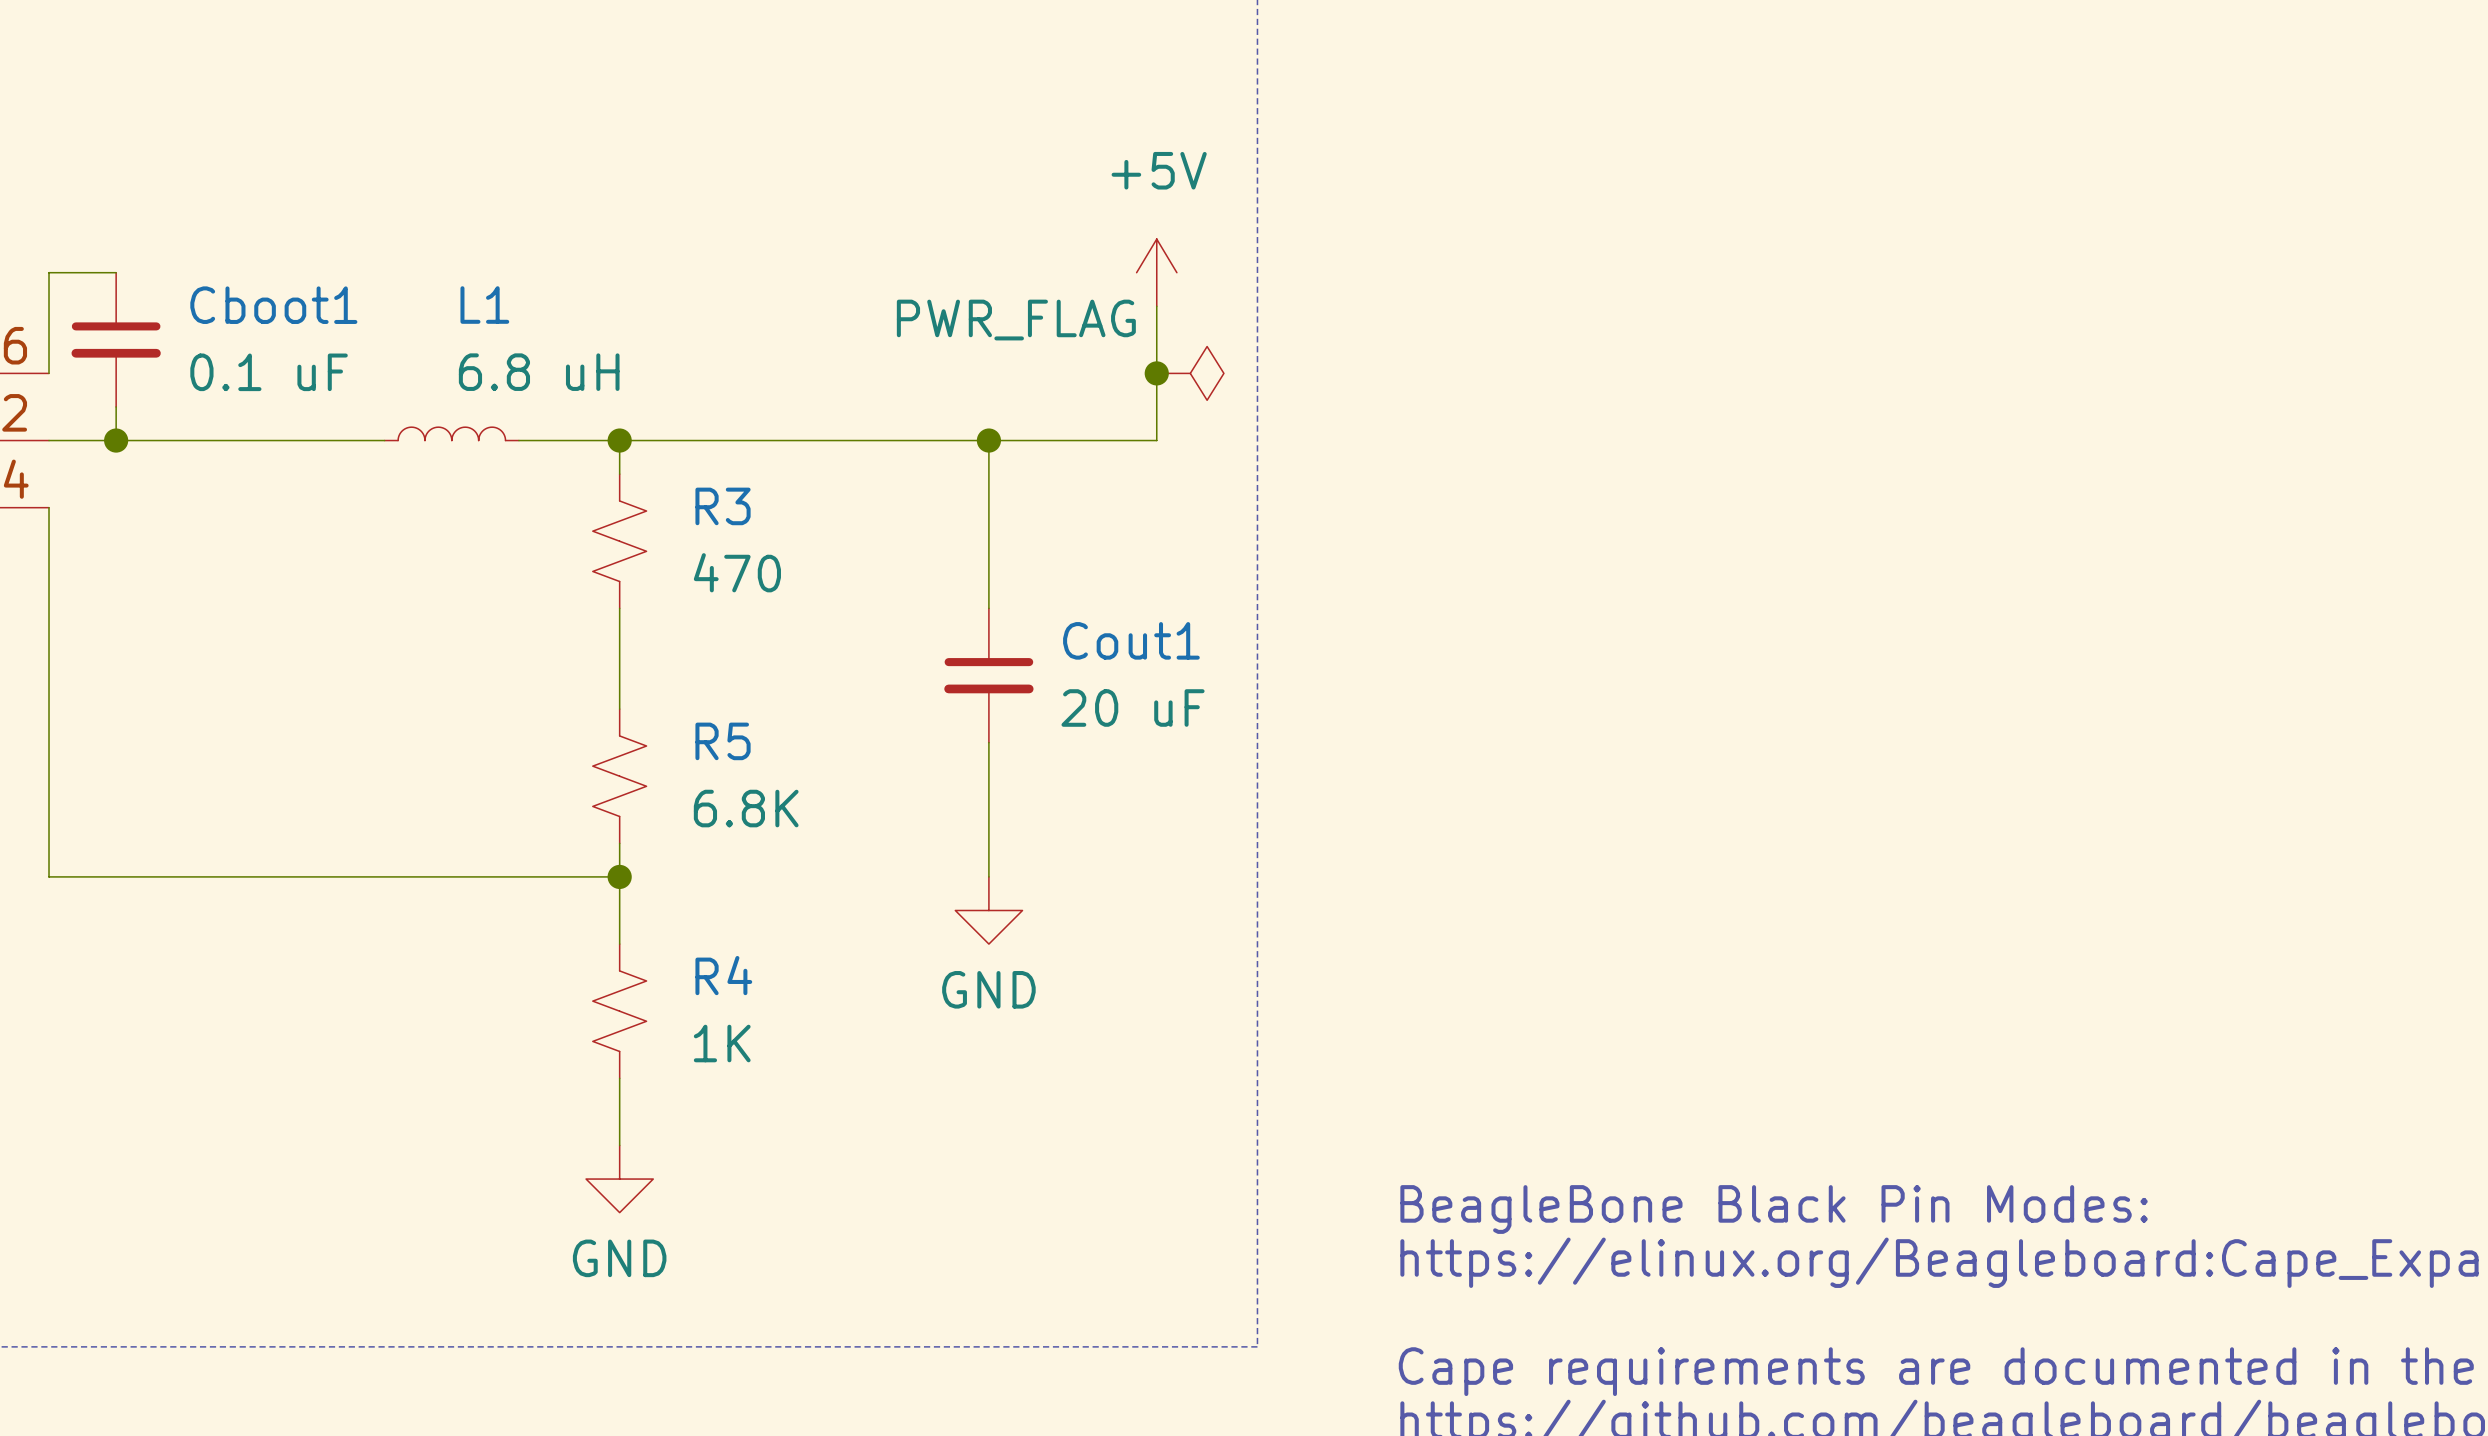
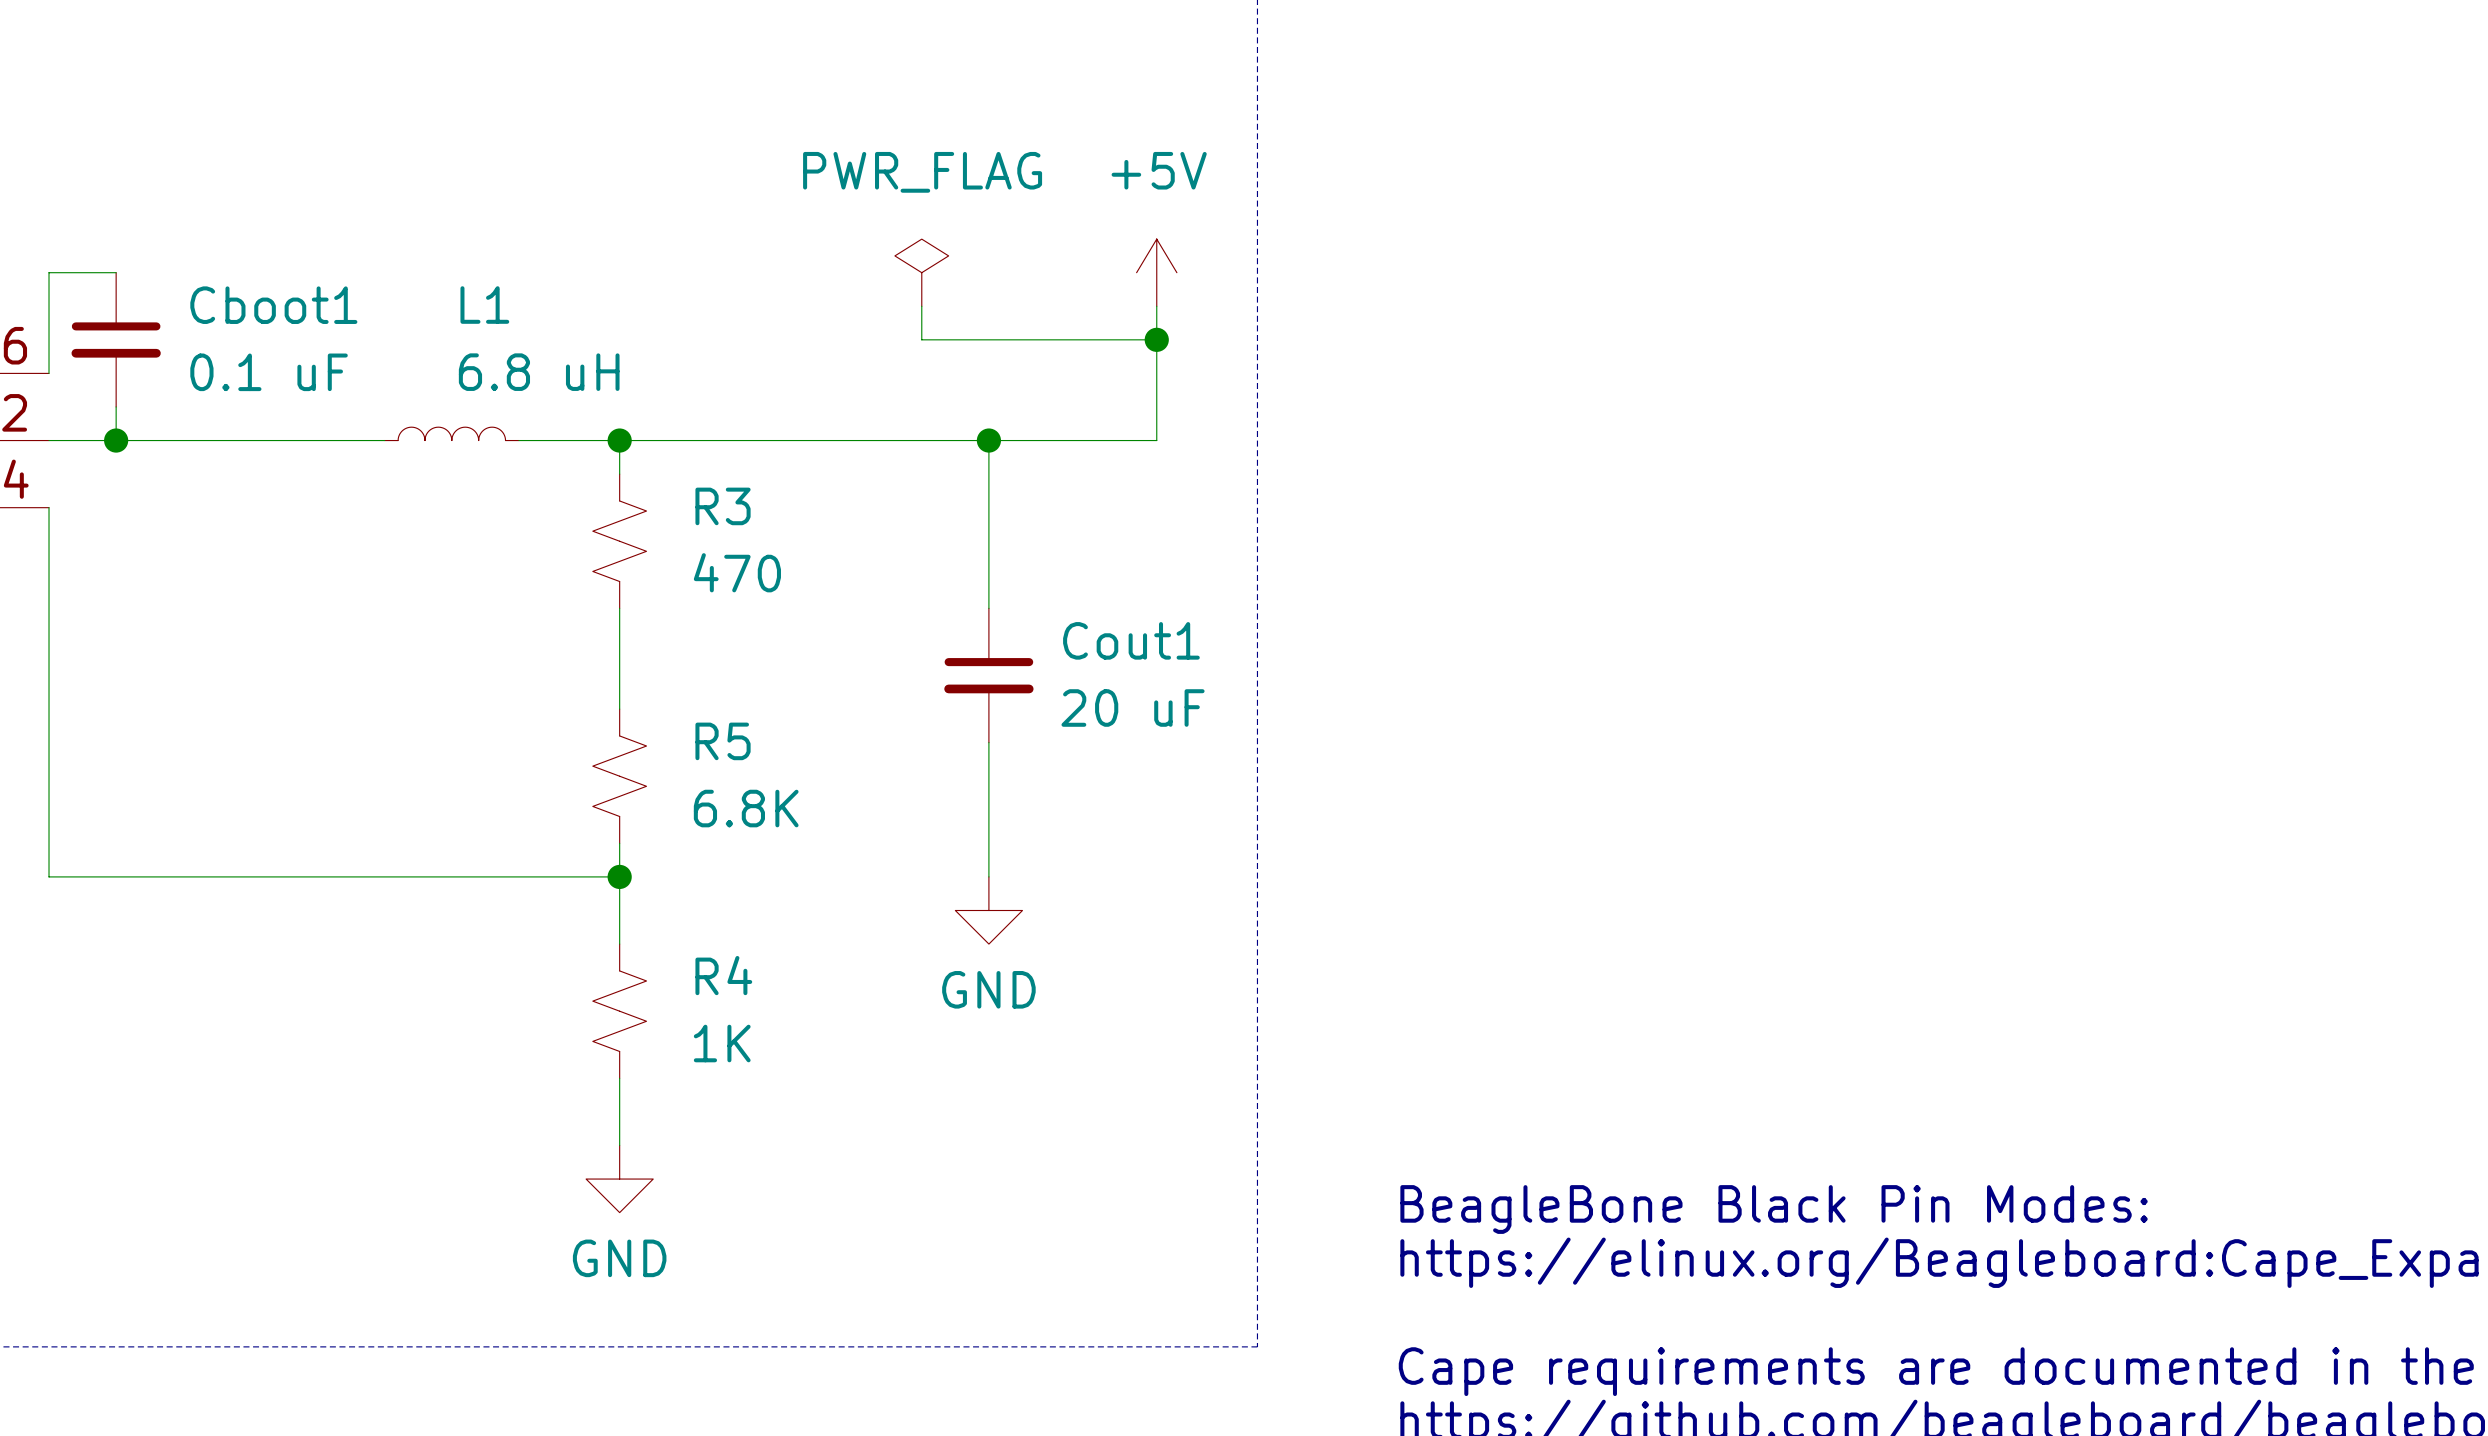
wire: none -> (921, 306) (921, 339) (1156, 339)
power symbol text position: PWR_FLAG (1016, 320) -> PWR_FLAG (922, 172)
junction position: (1156, 373) -> (1156, 339)
power symbol rotation: 0° (1190, 373) -> 90° counterclockwise (921, 272)
power symbol position: PWR_FLAG (1190, 373) -> PWR_FLAG (921, 272)

